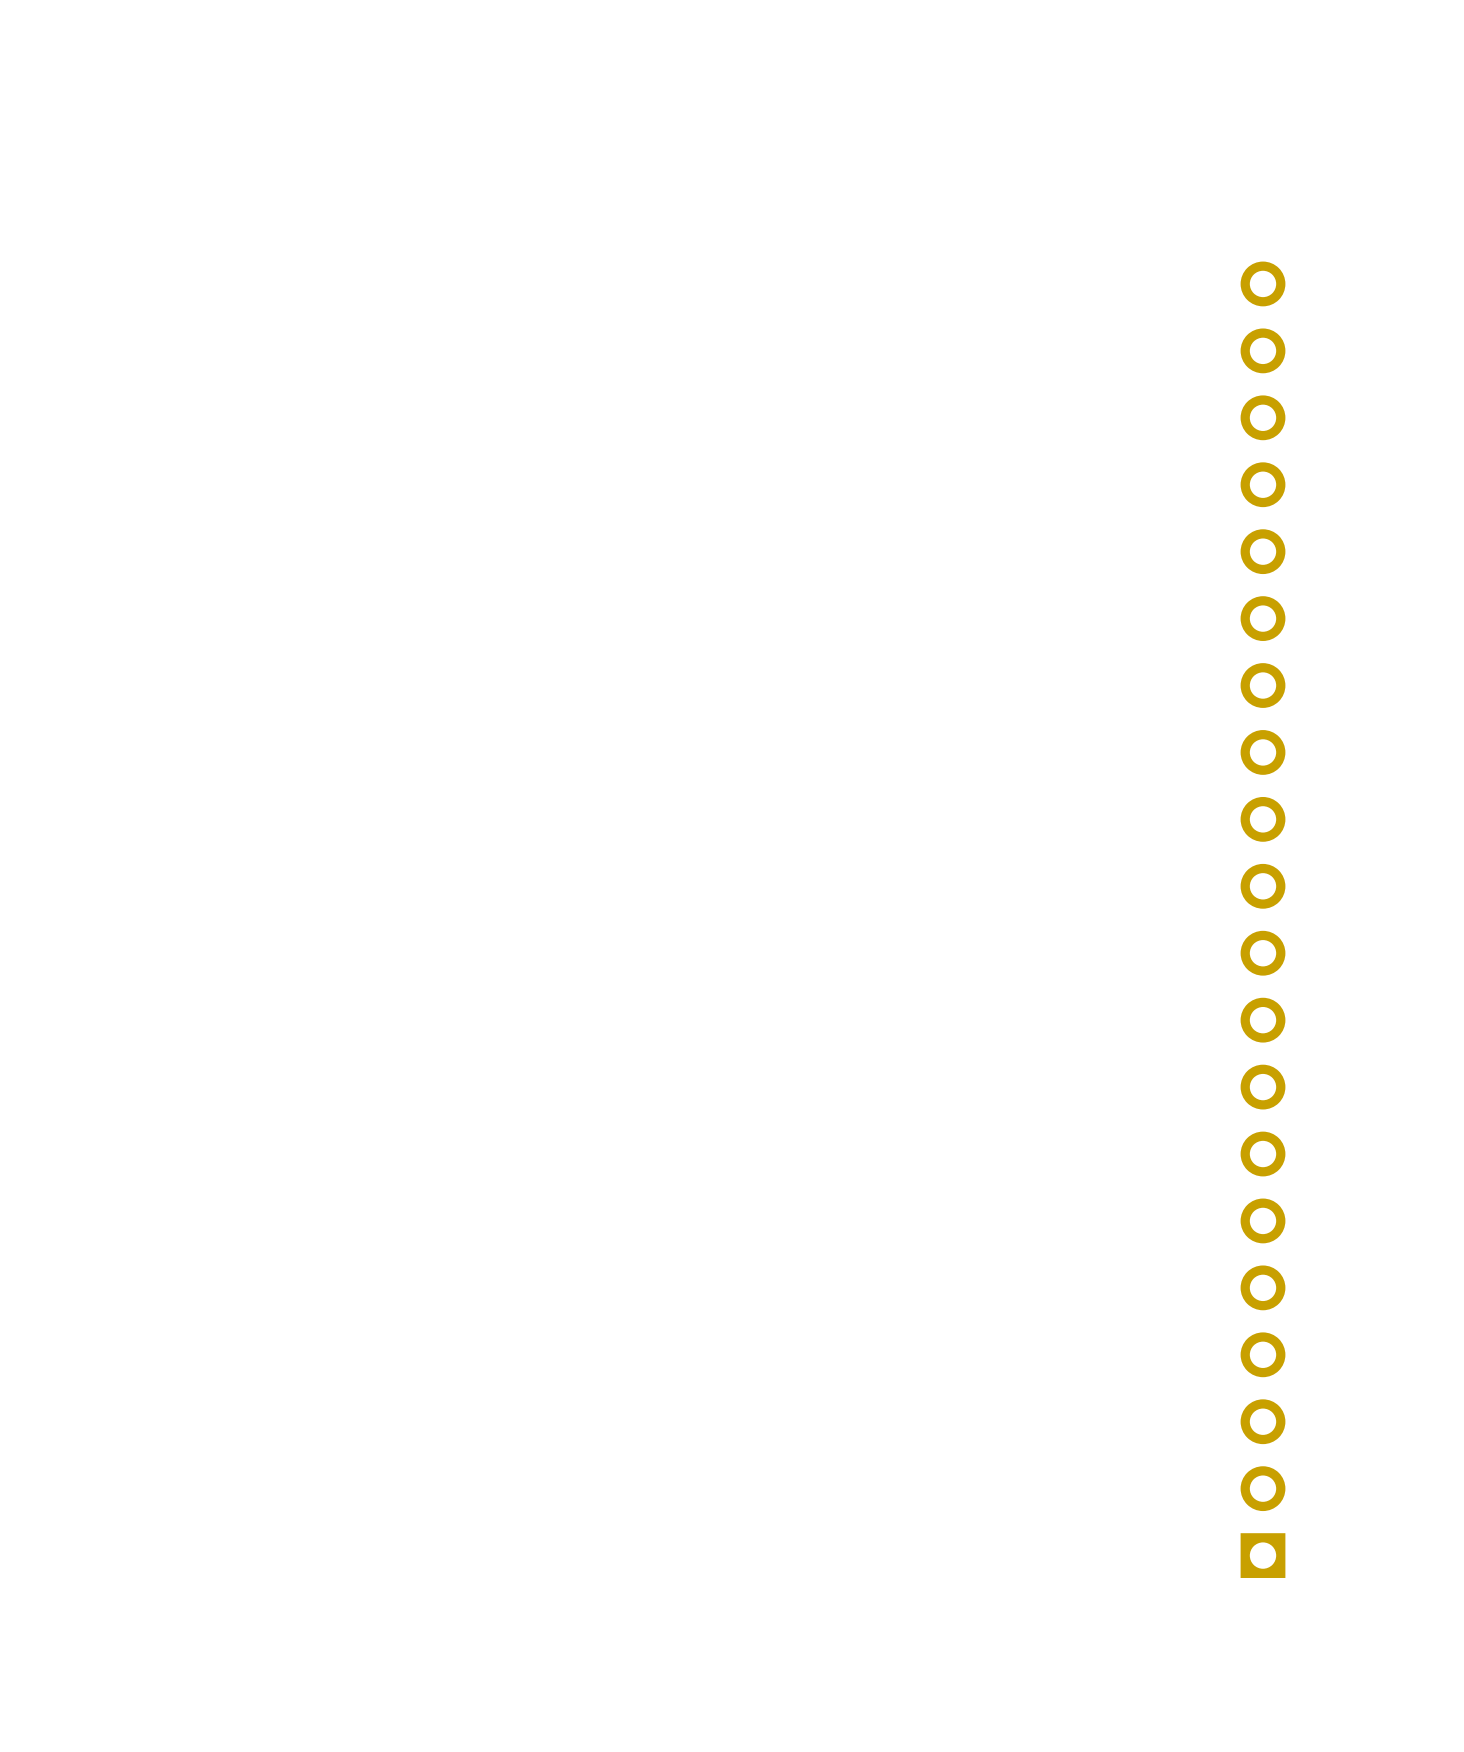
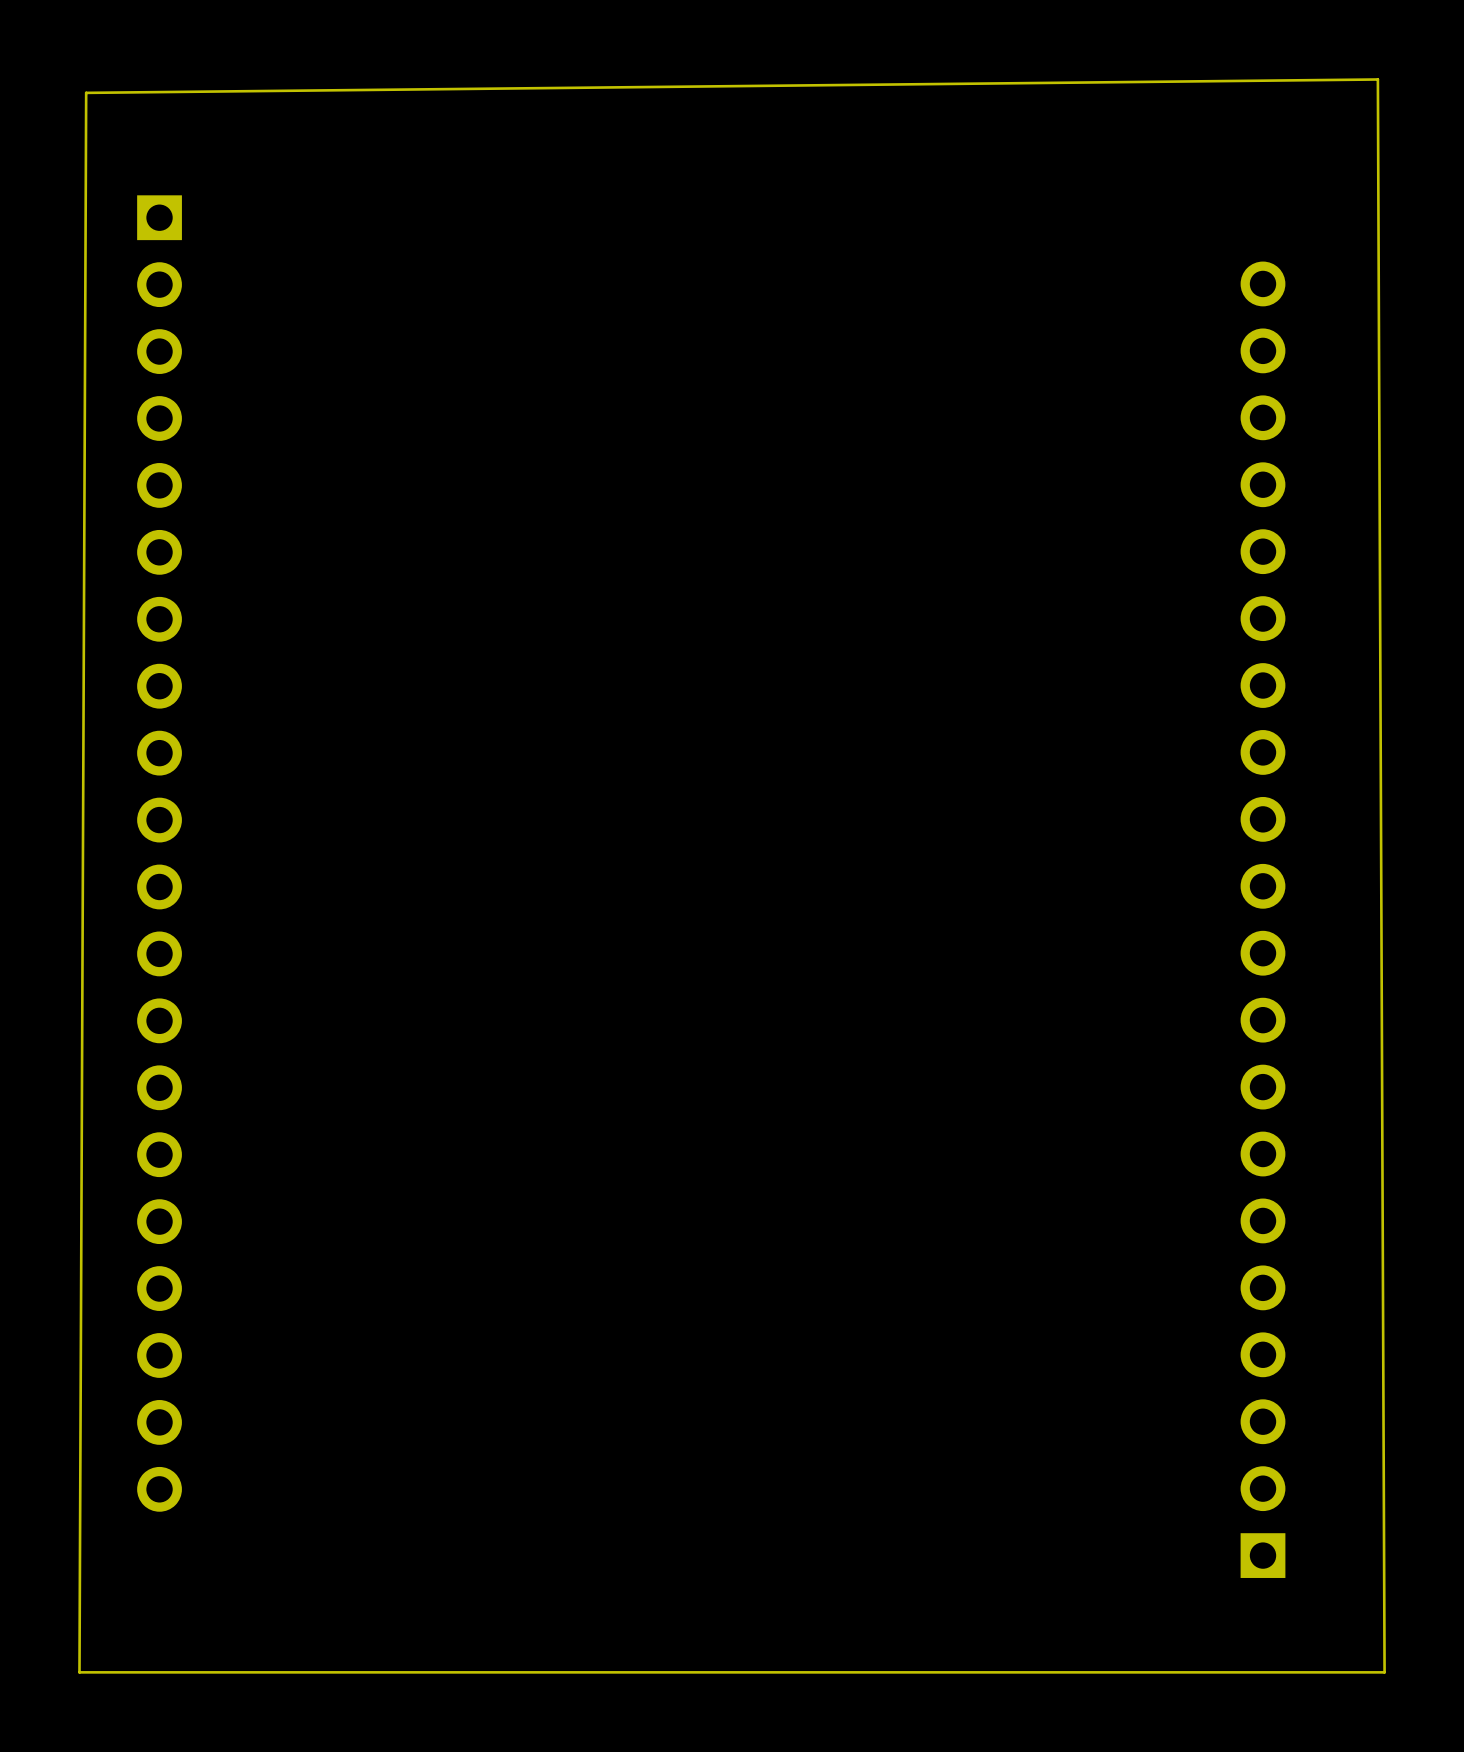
board edge: none -> (1377, 79) (86, 92) (79, 1672) (1384, 1672) (1377, 79)
part: none -> (159, 853)

